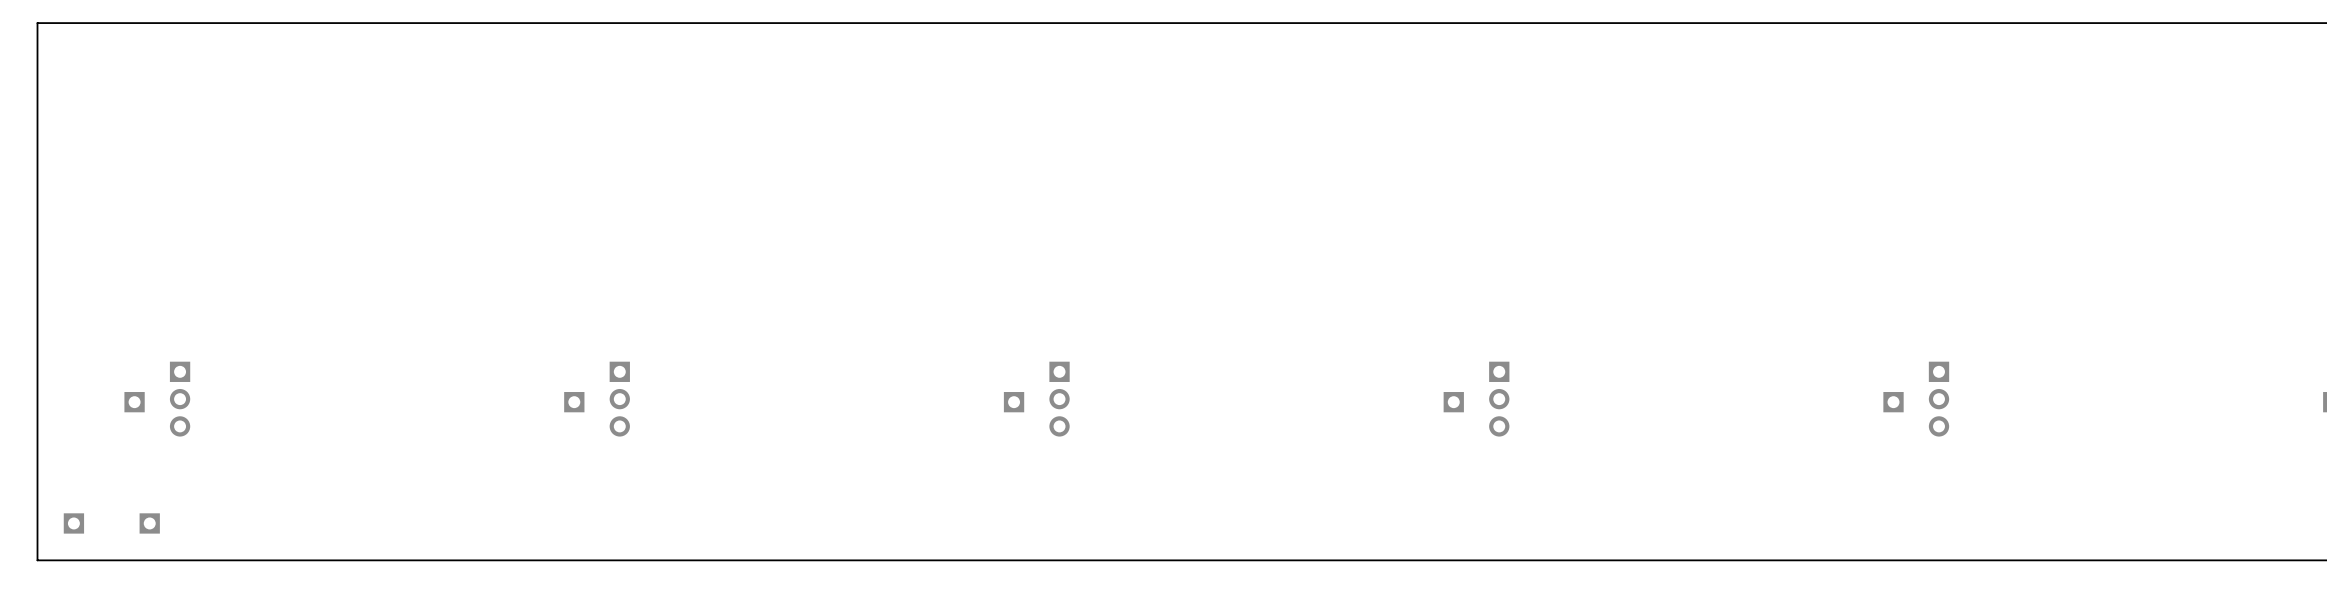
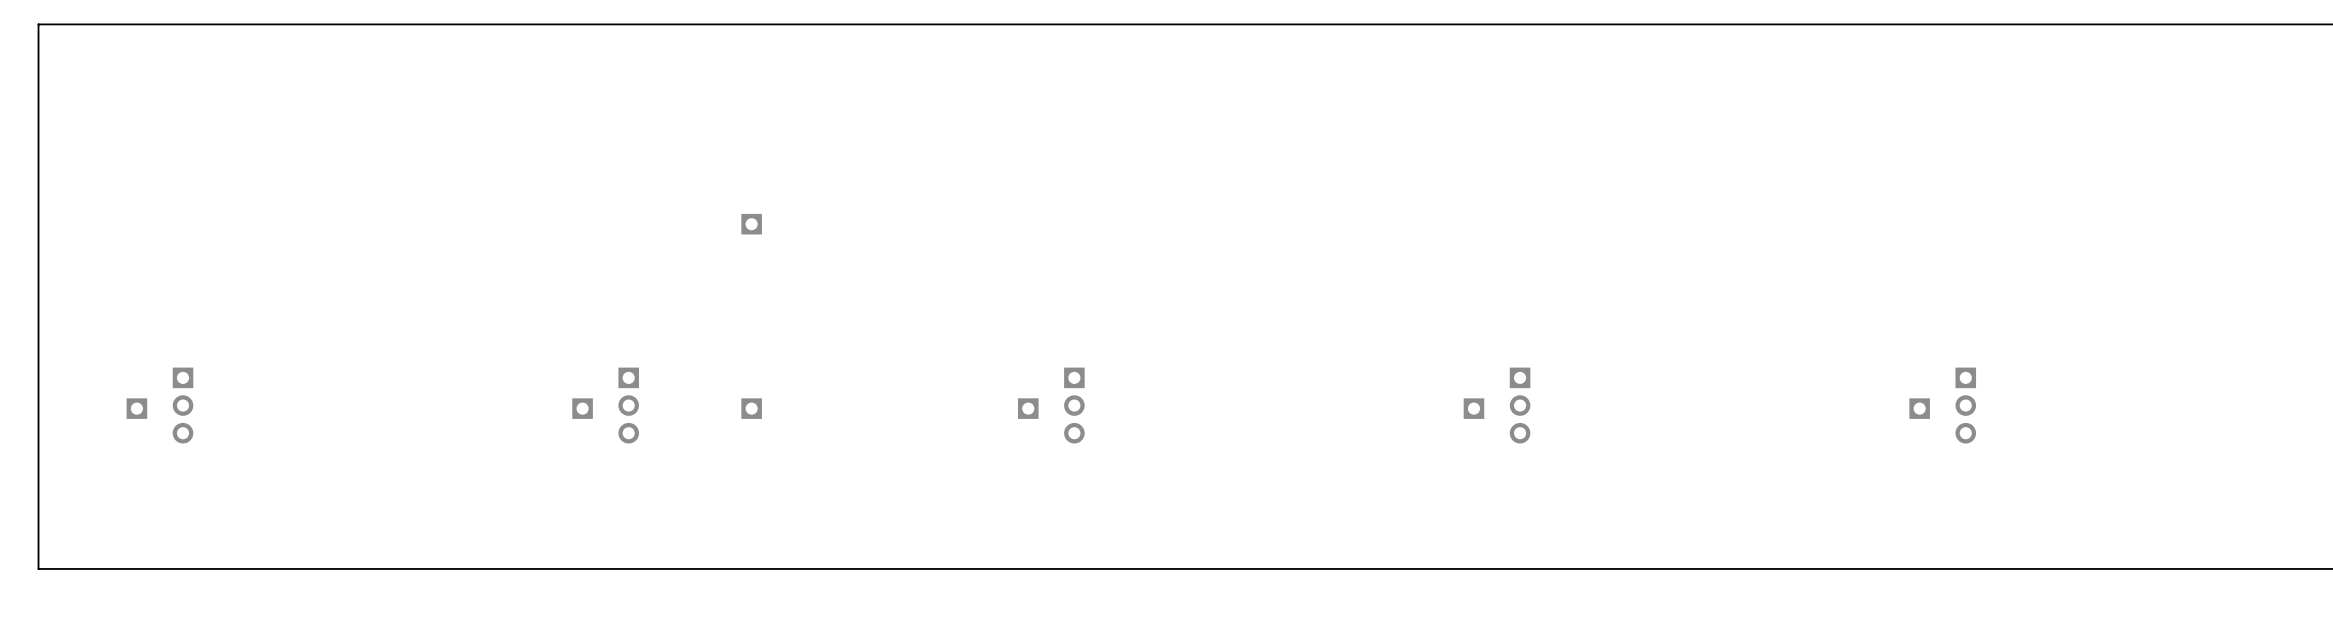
part: none -> (751, 224)
part: none -> (751, 408)
part: (73, 523) -> none
part: (149, 523) -> none

